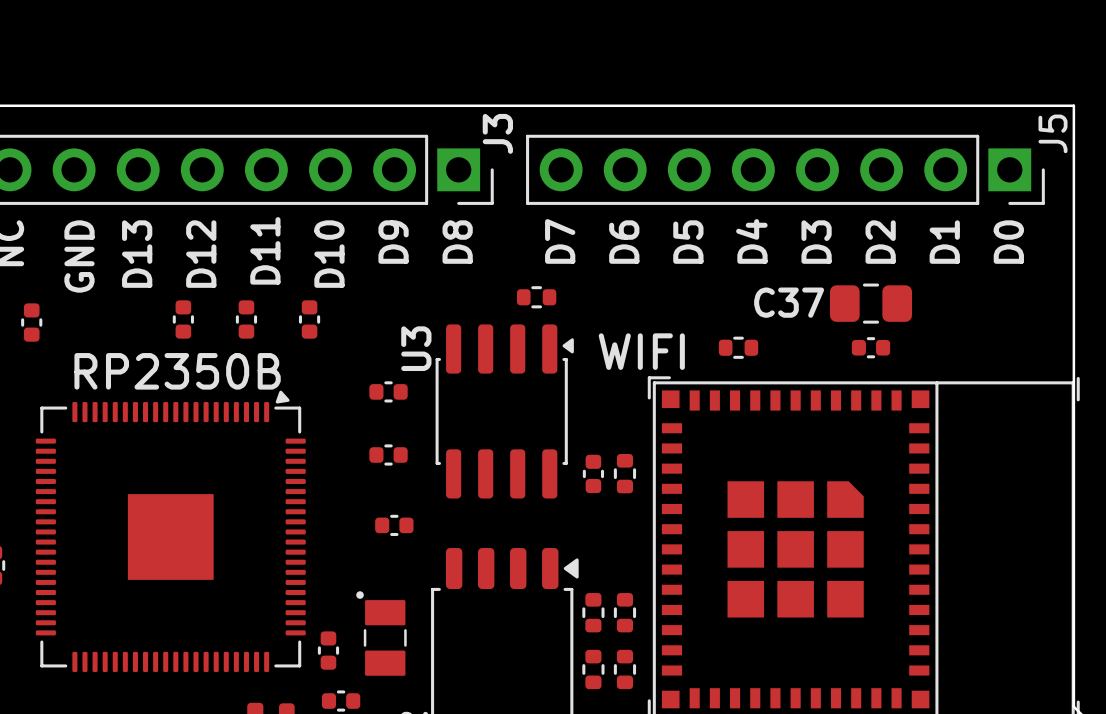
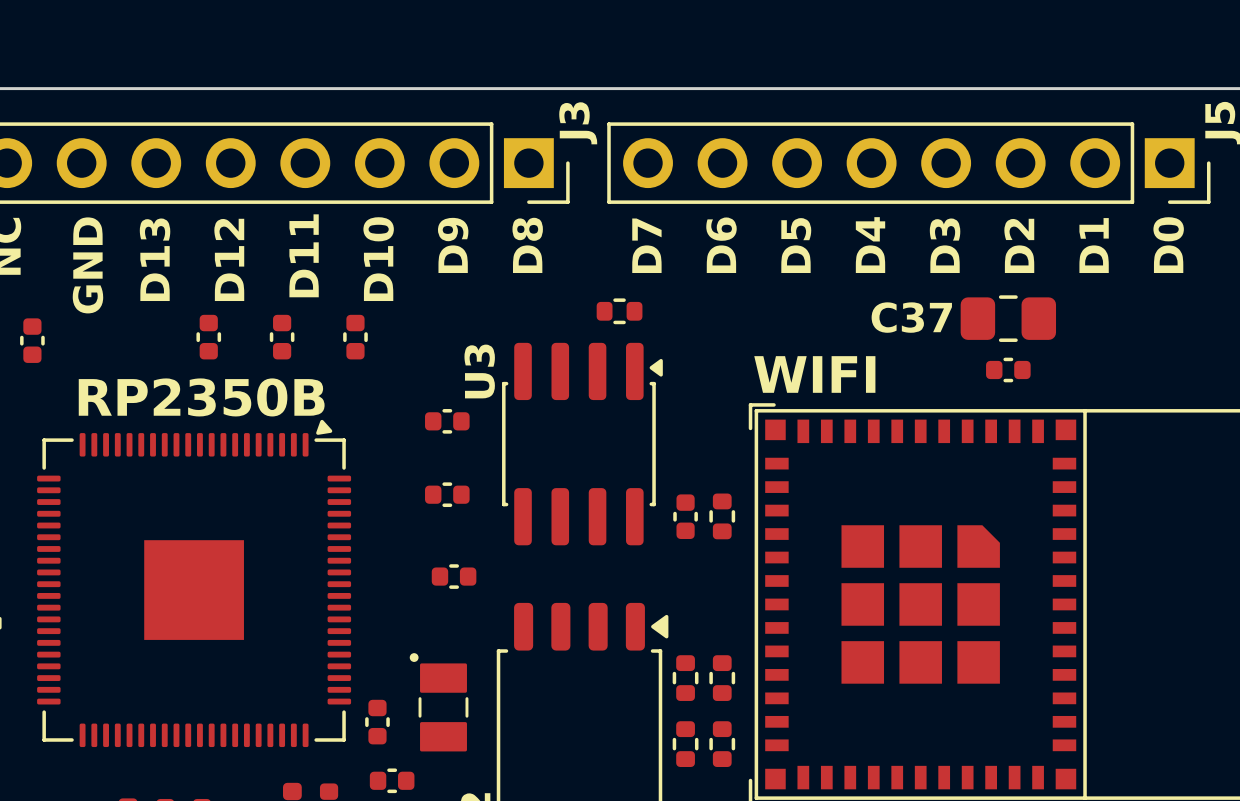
part: (738, 347) -> none
text position: WIFI (641, 351) -> WIFI (814, 374)

